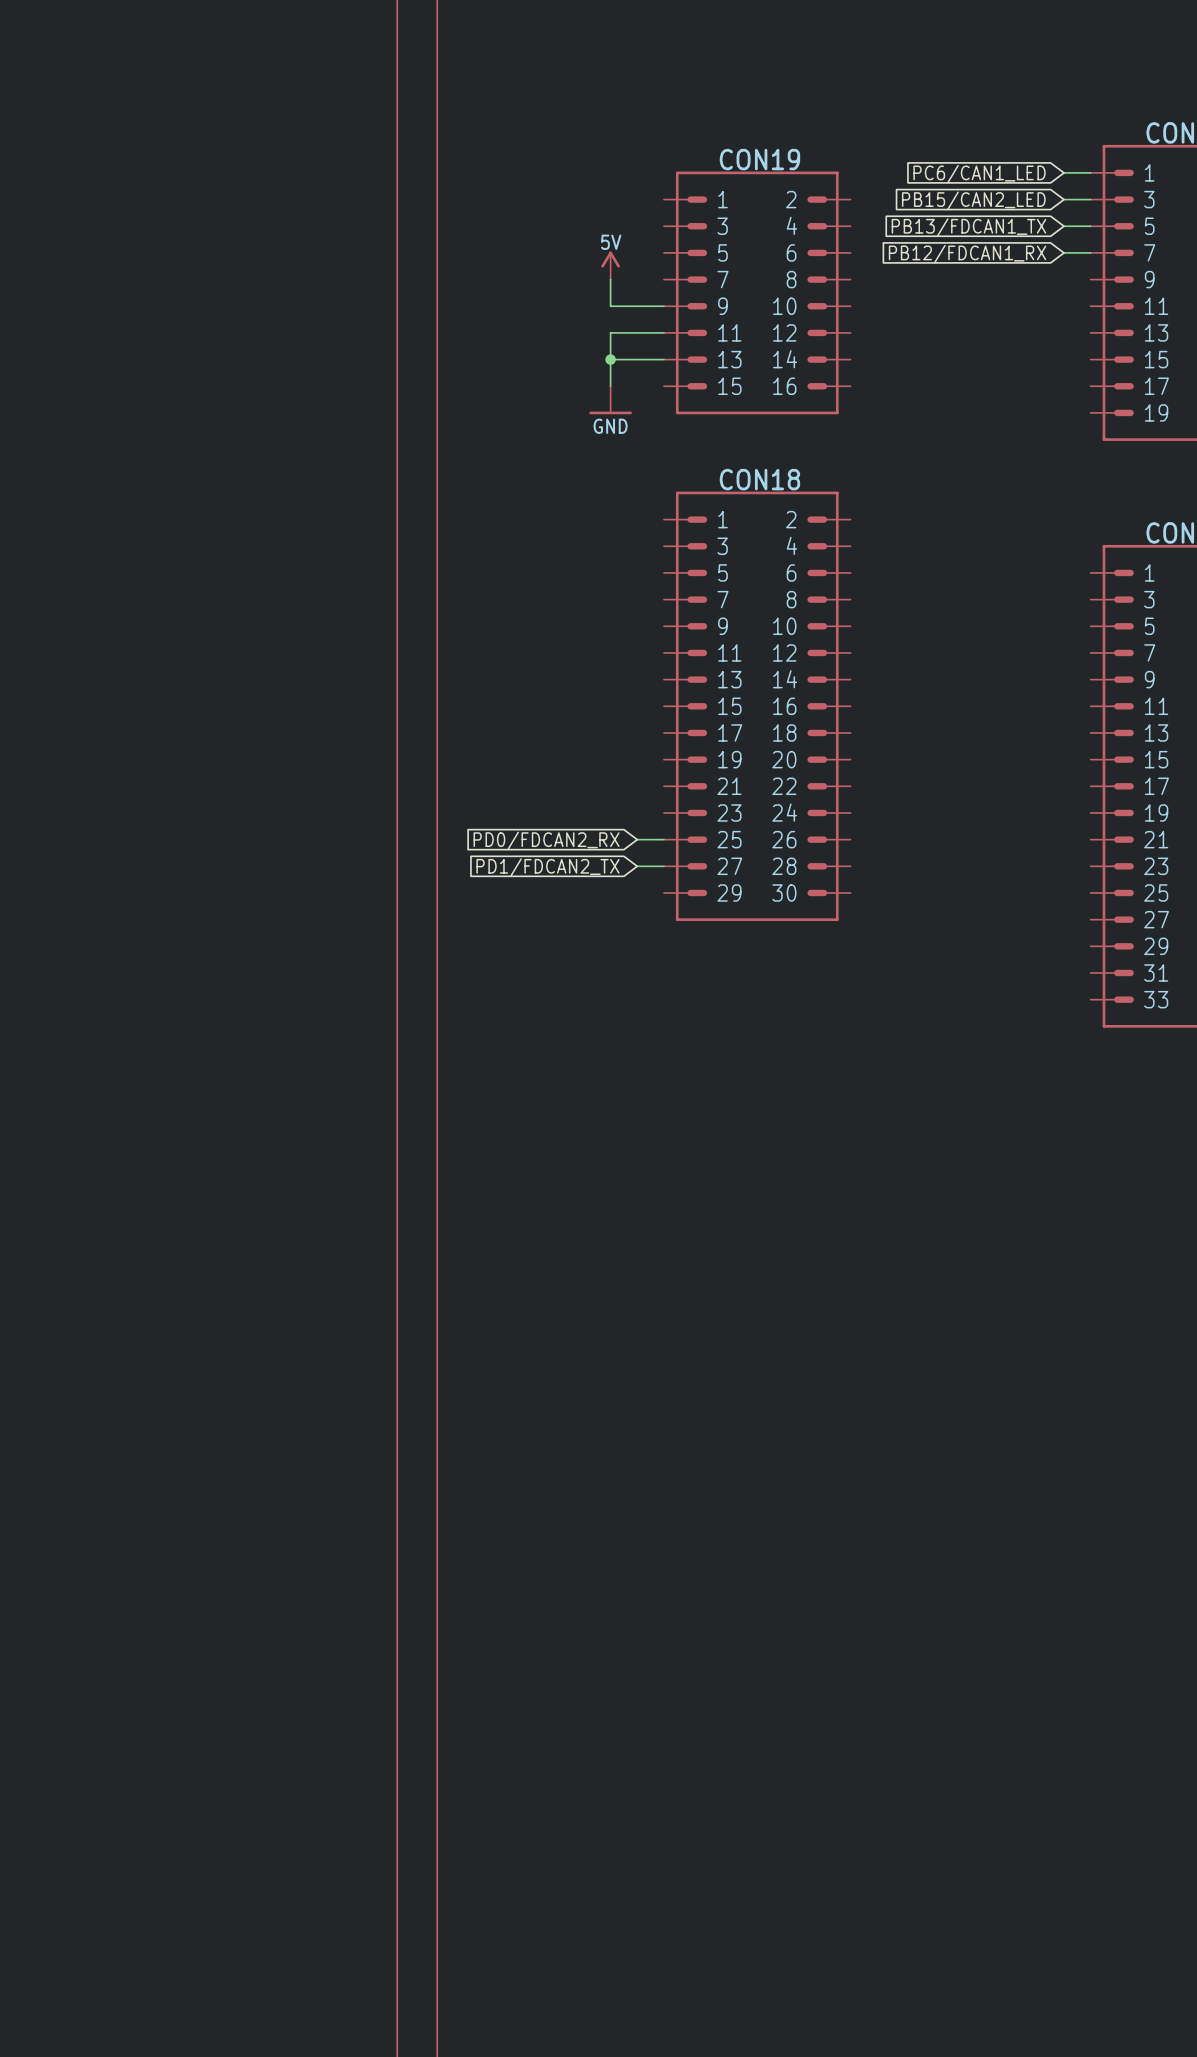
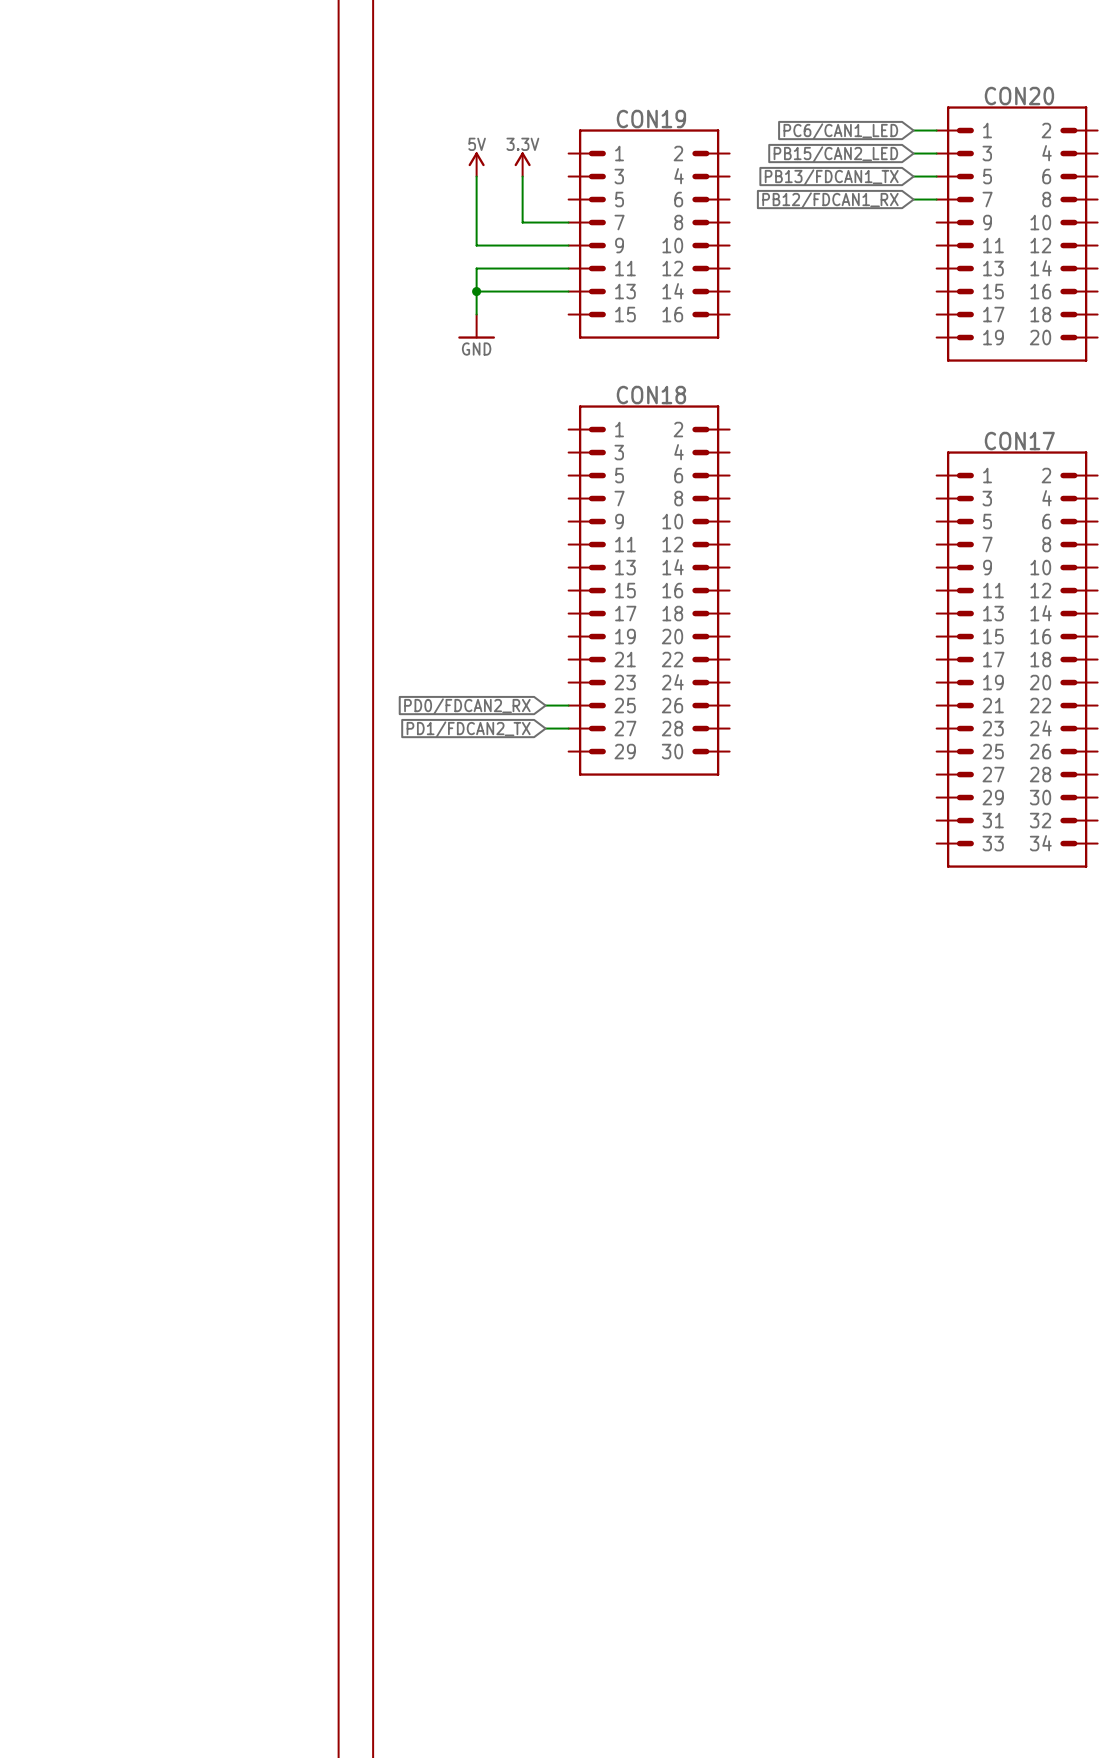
power symbol: none -> 3.3V (522, 164)
wire: none -> (522, 176) (522, 222) (568, 222)
power symbol position: 5V (610, 265) -> 5V (476, 164)
wire: (610, 279) (610, 306) -> (476, 176) (476, 245) (522, 245)
wire: (610, 332) (610, 386) -> (522, 268) (476, 268) (476, 314)
wire: none -> (476, 291) (522, 291)
junction position: (610, 359) -> (476, 291)
power symbol position: GND (610, 400) -> GND (476, 326)

